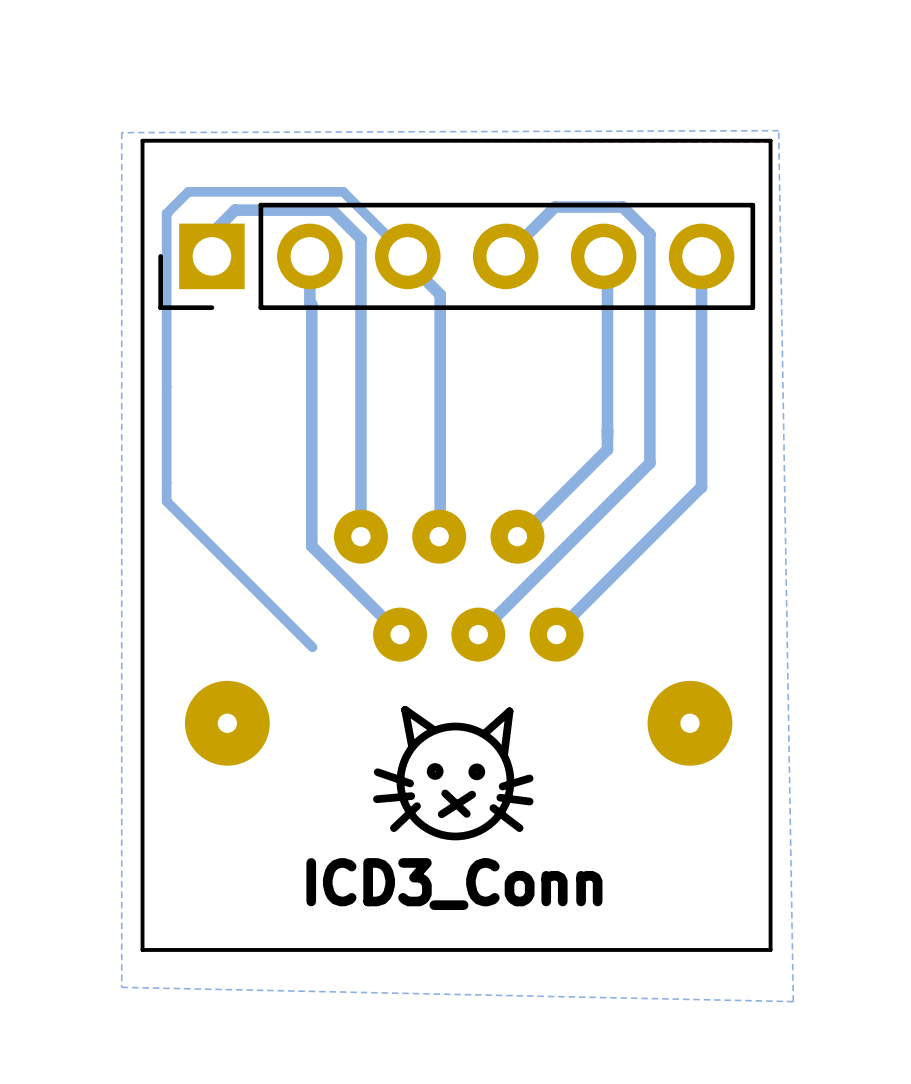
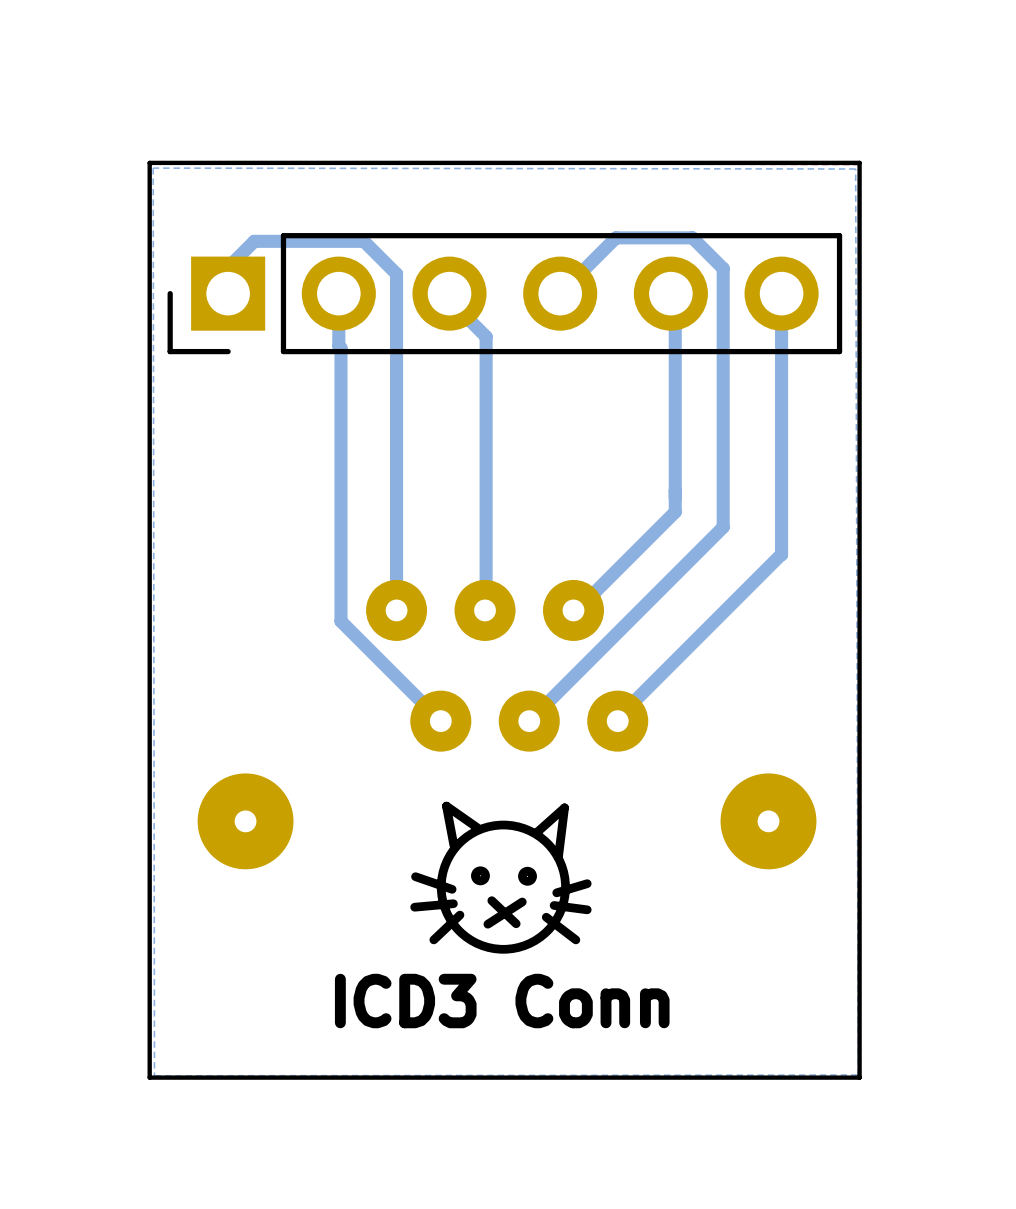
bottom zone outline: (778, 130) (121, 132) (121, 987) (793, 1001) (778, 130) -> (153, 168) (855, 168) (858, 1074) (154, 1075) (153, 168)
bottom track: (407, 256) (343, 191) (188, 191) (166, 213) (166, 501) (312, 647) -> none
text: ICD3_Conn (454, 884) -> ICD3 Conn (502, 1001)

